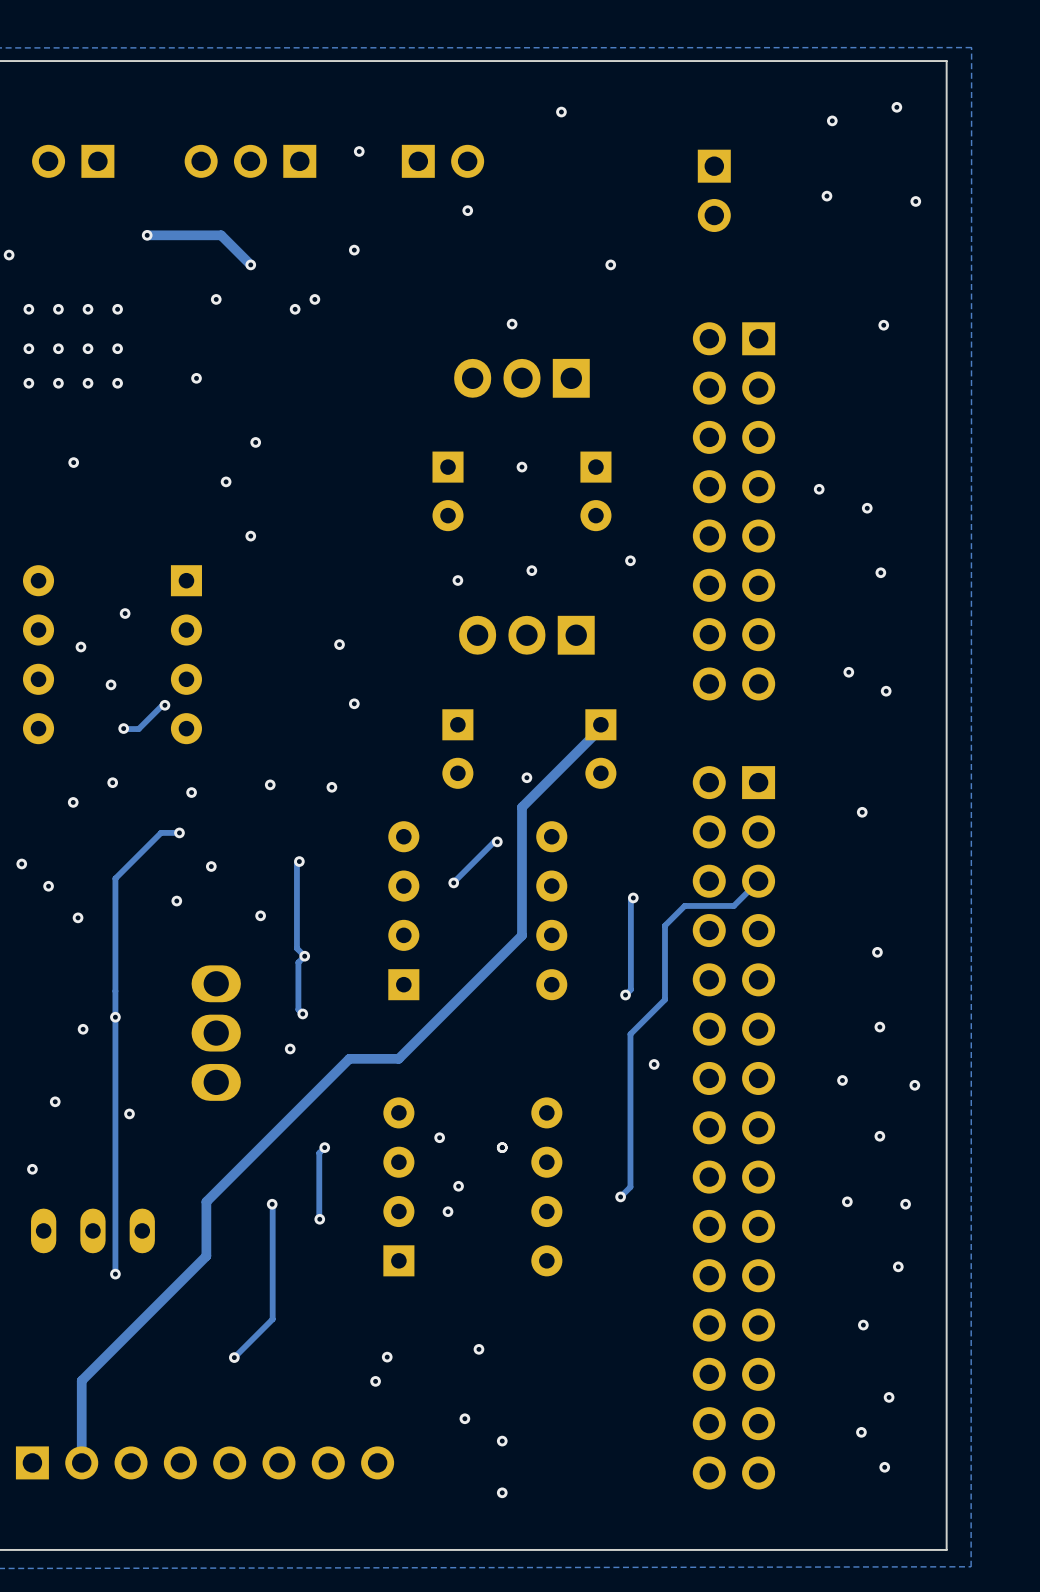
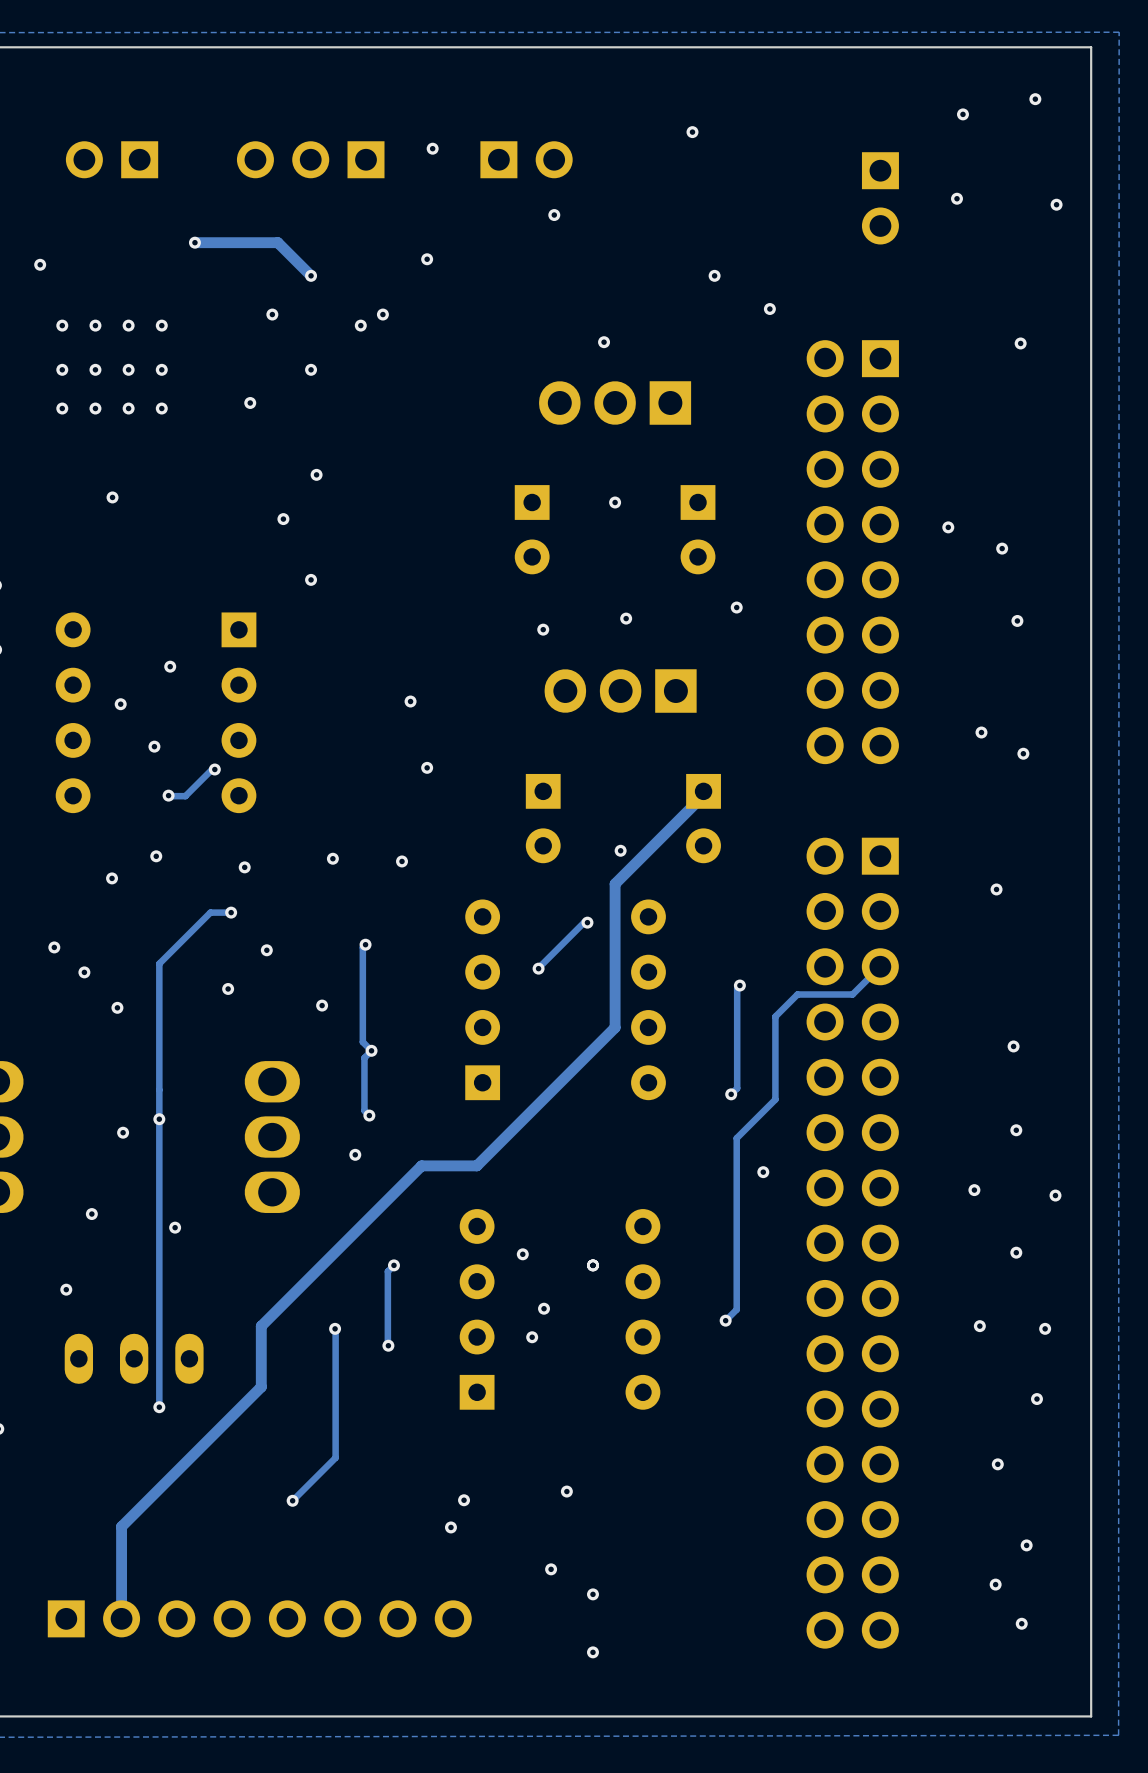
via position: (561, 112) -> (692, 132)
part position: (714, 190) -> (880, 198)
via: none -> (769, 309)
via: none -> (311, 369)

